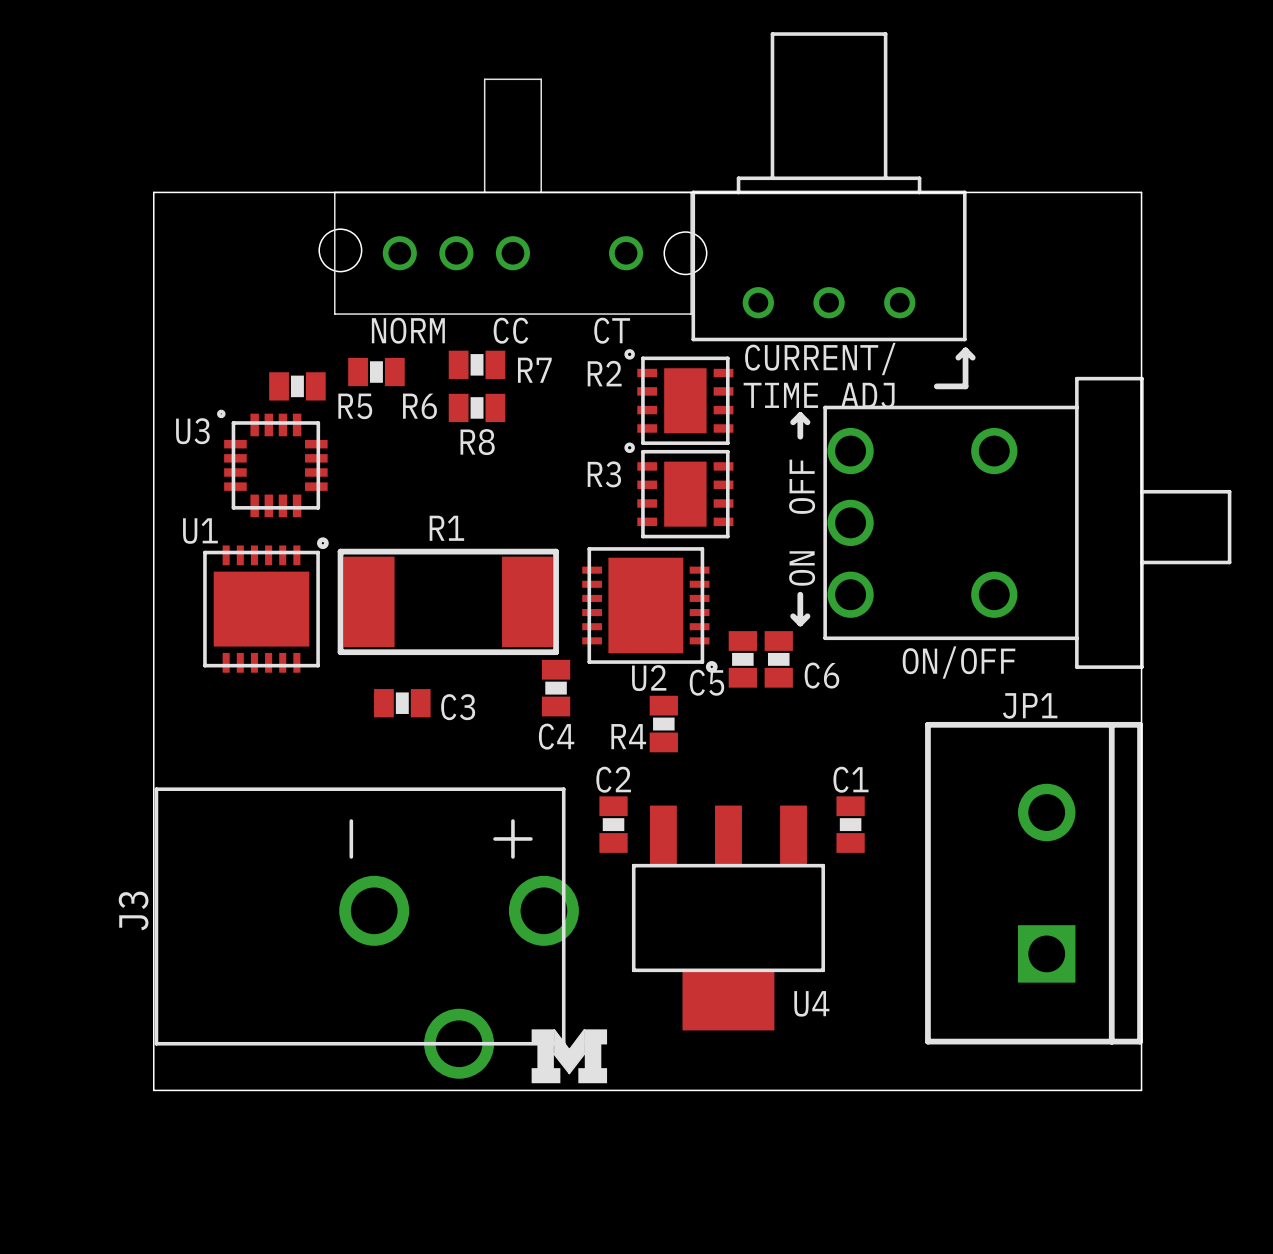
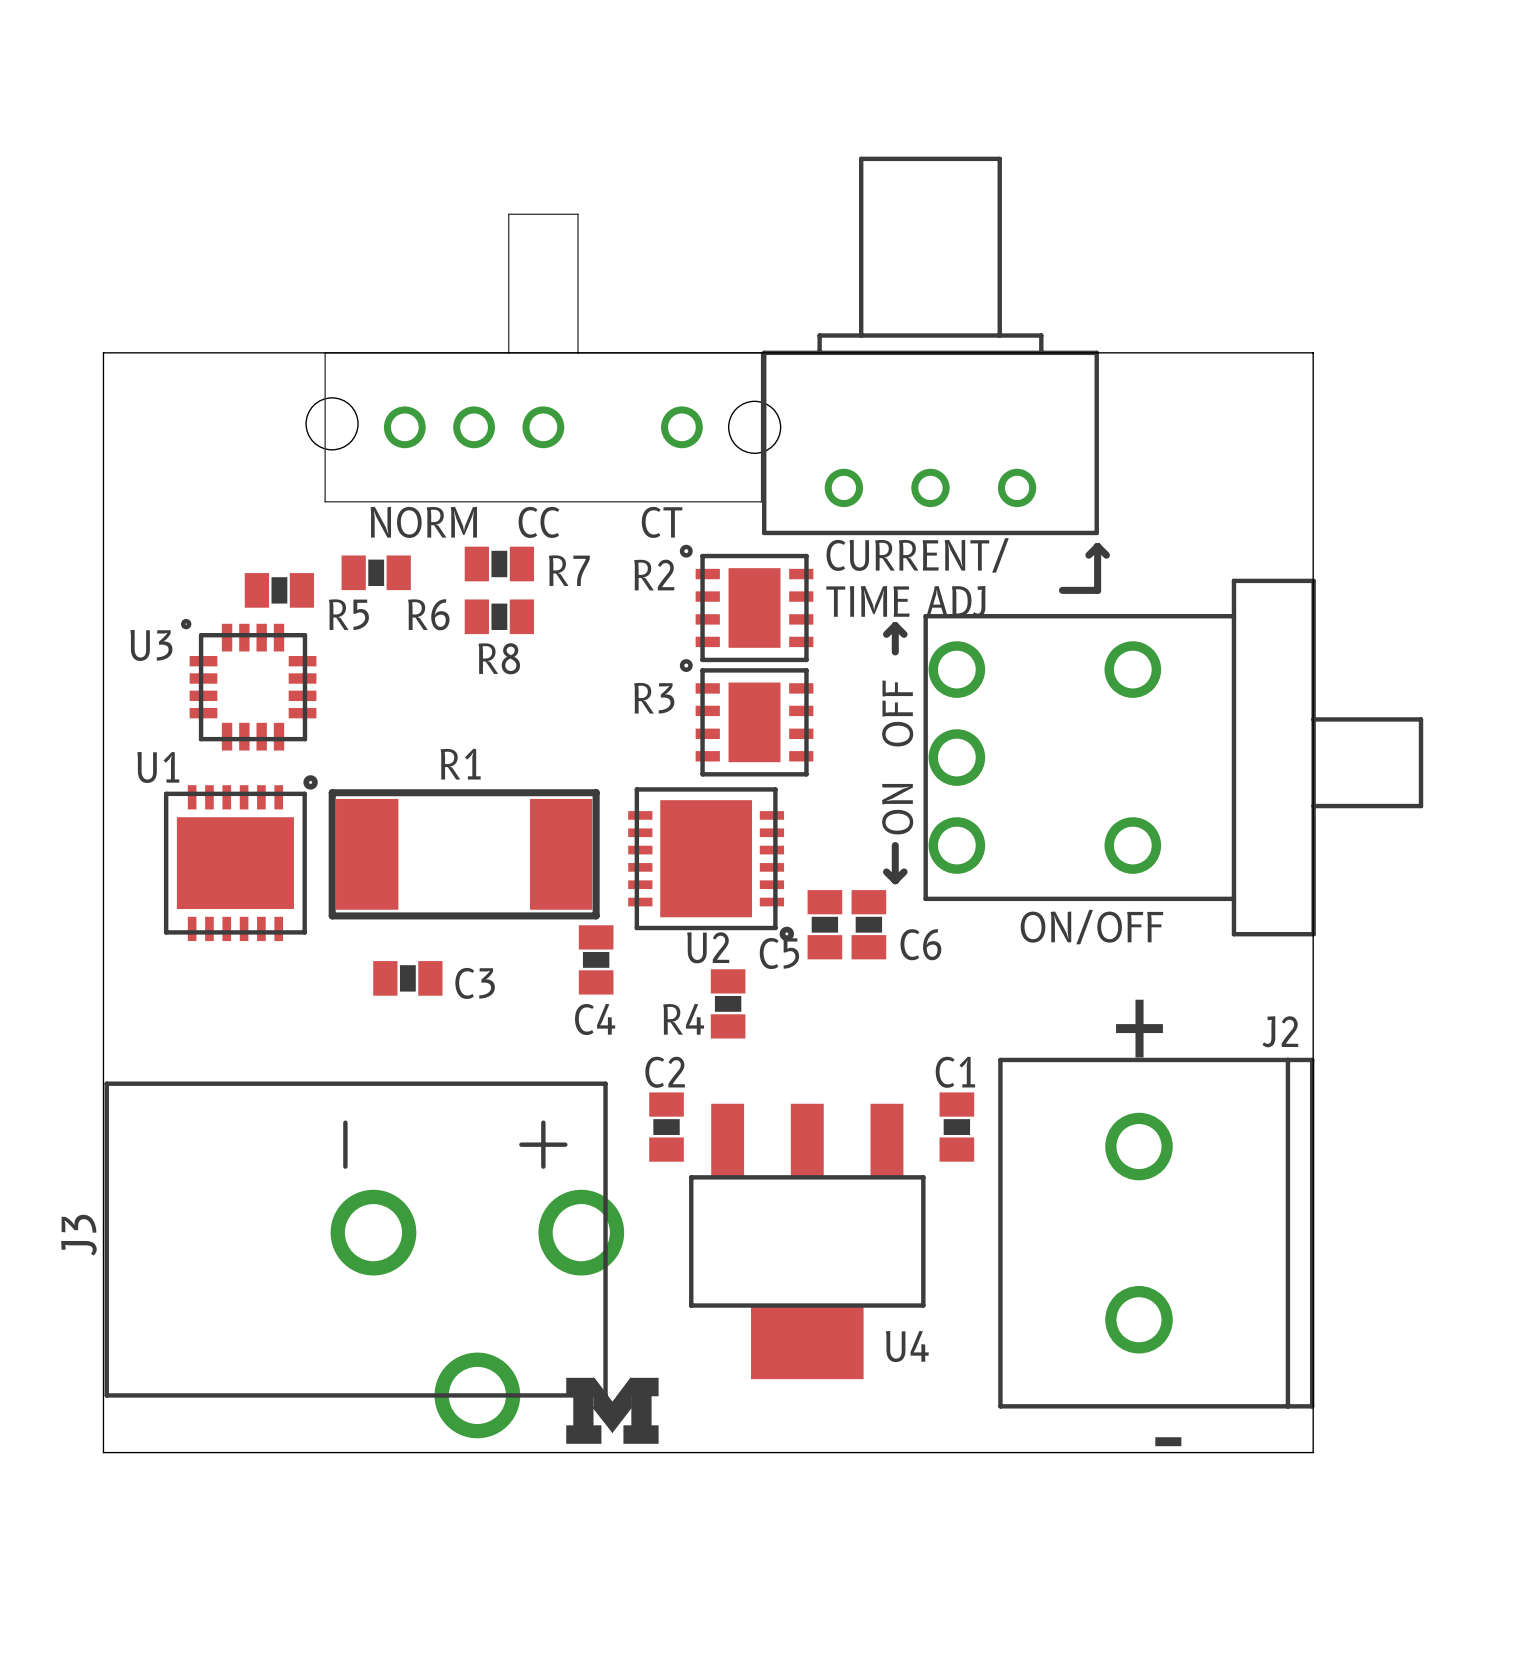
text: none -> + (1139, 1028)
JP1: (1033, 883) -> none
J2: none -> (1156, 1233)
text: none -> - (1168, 1441)

